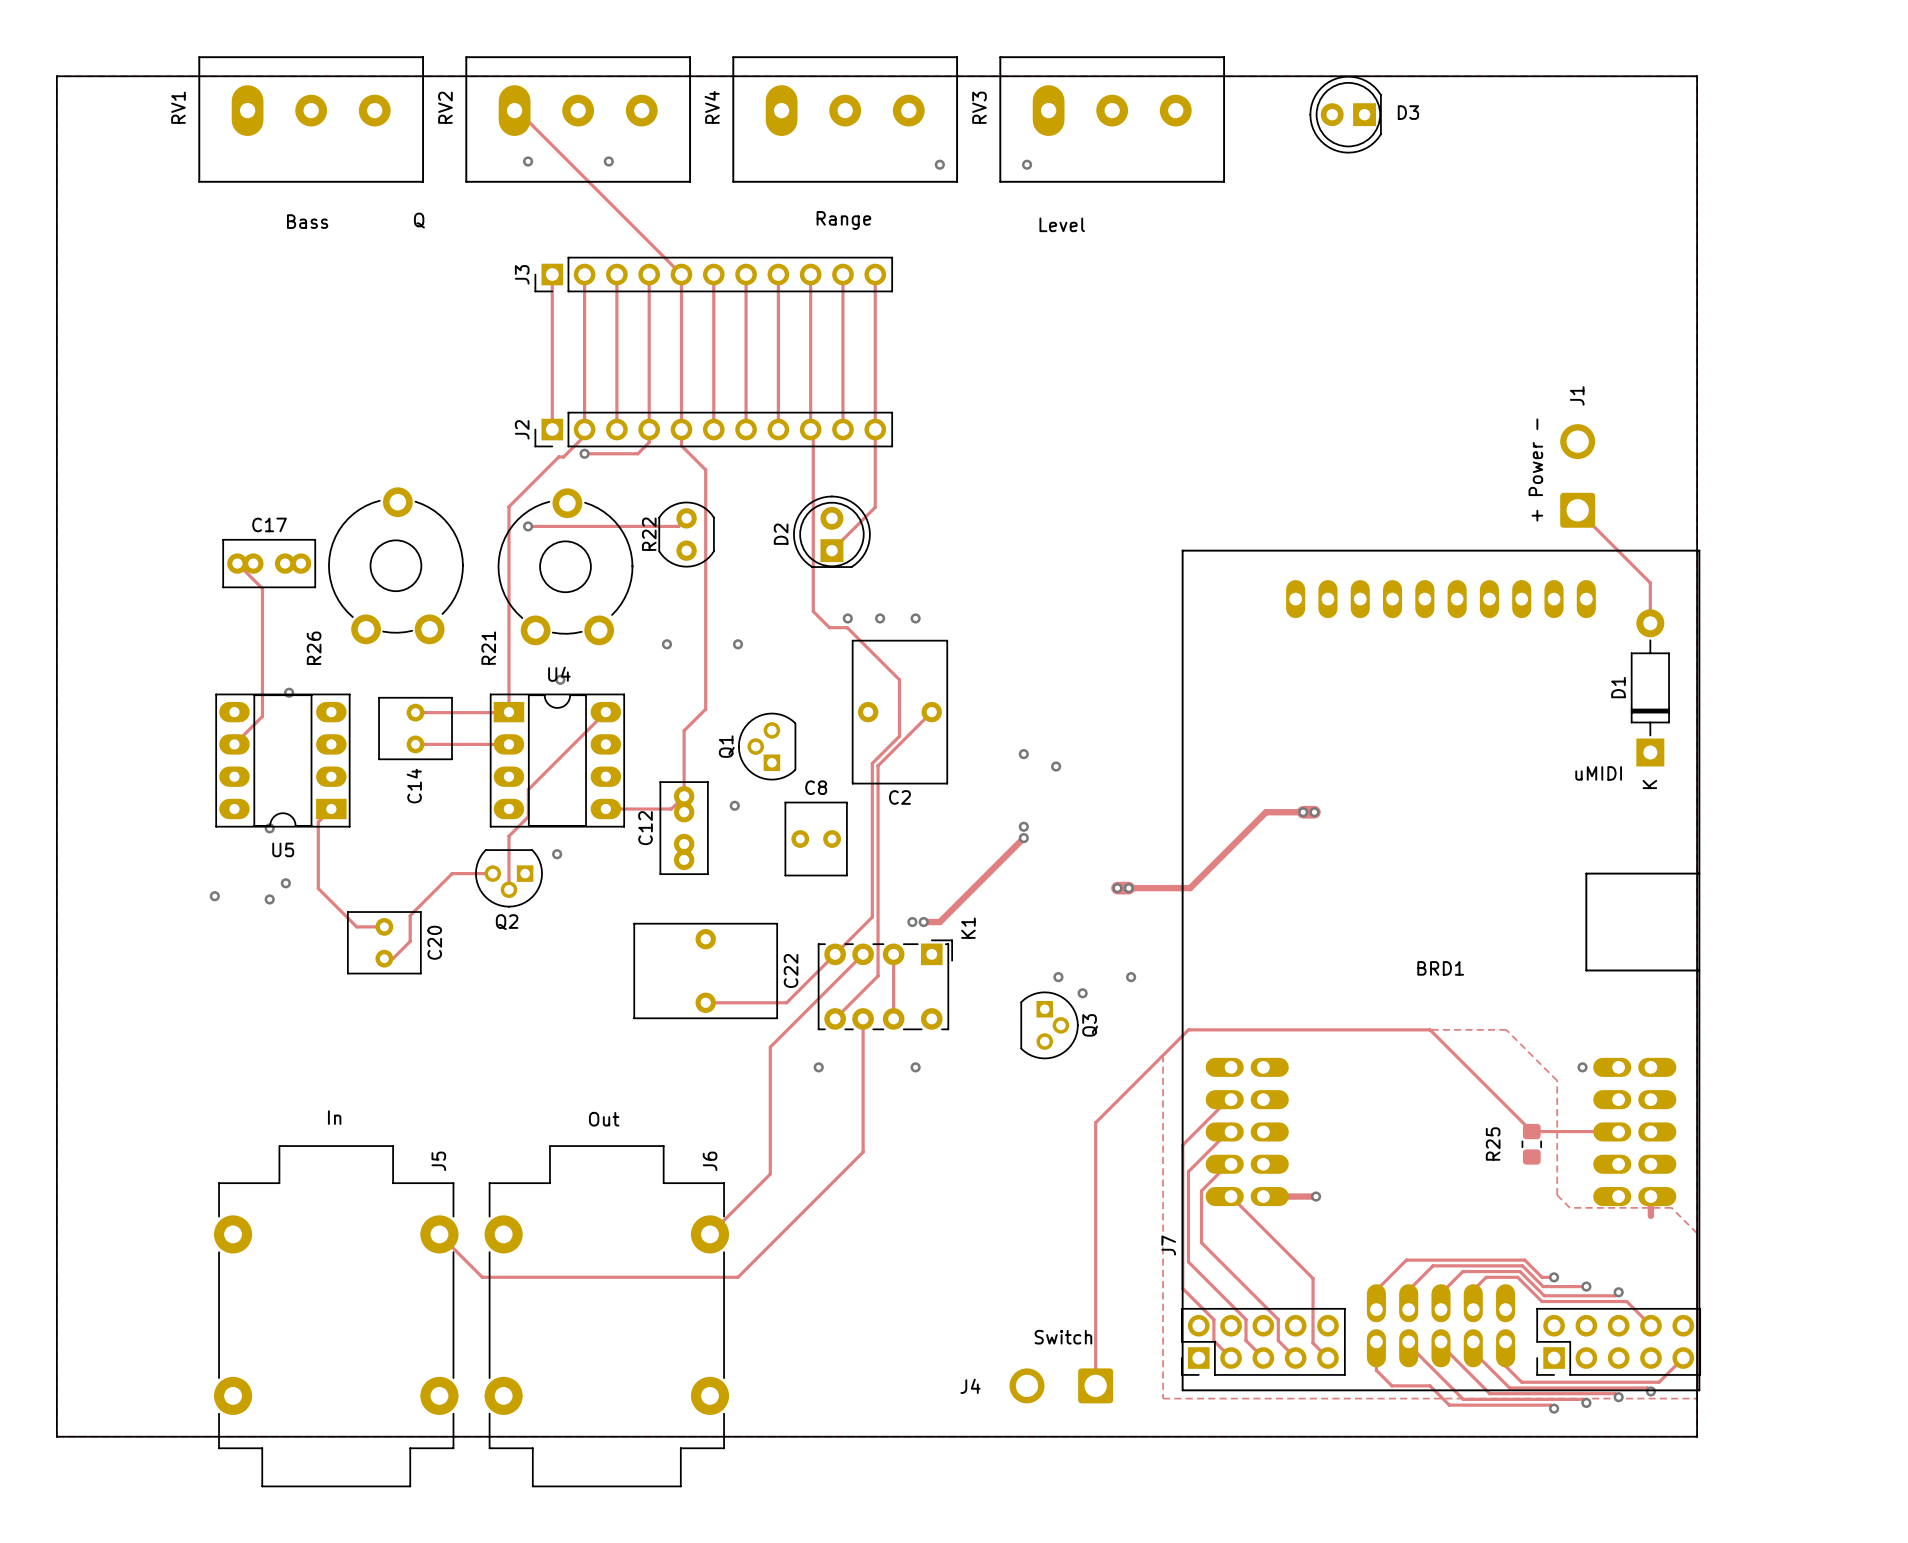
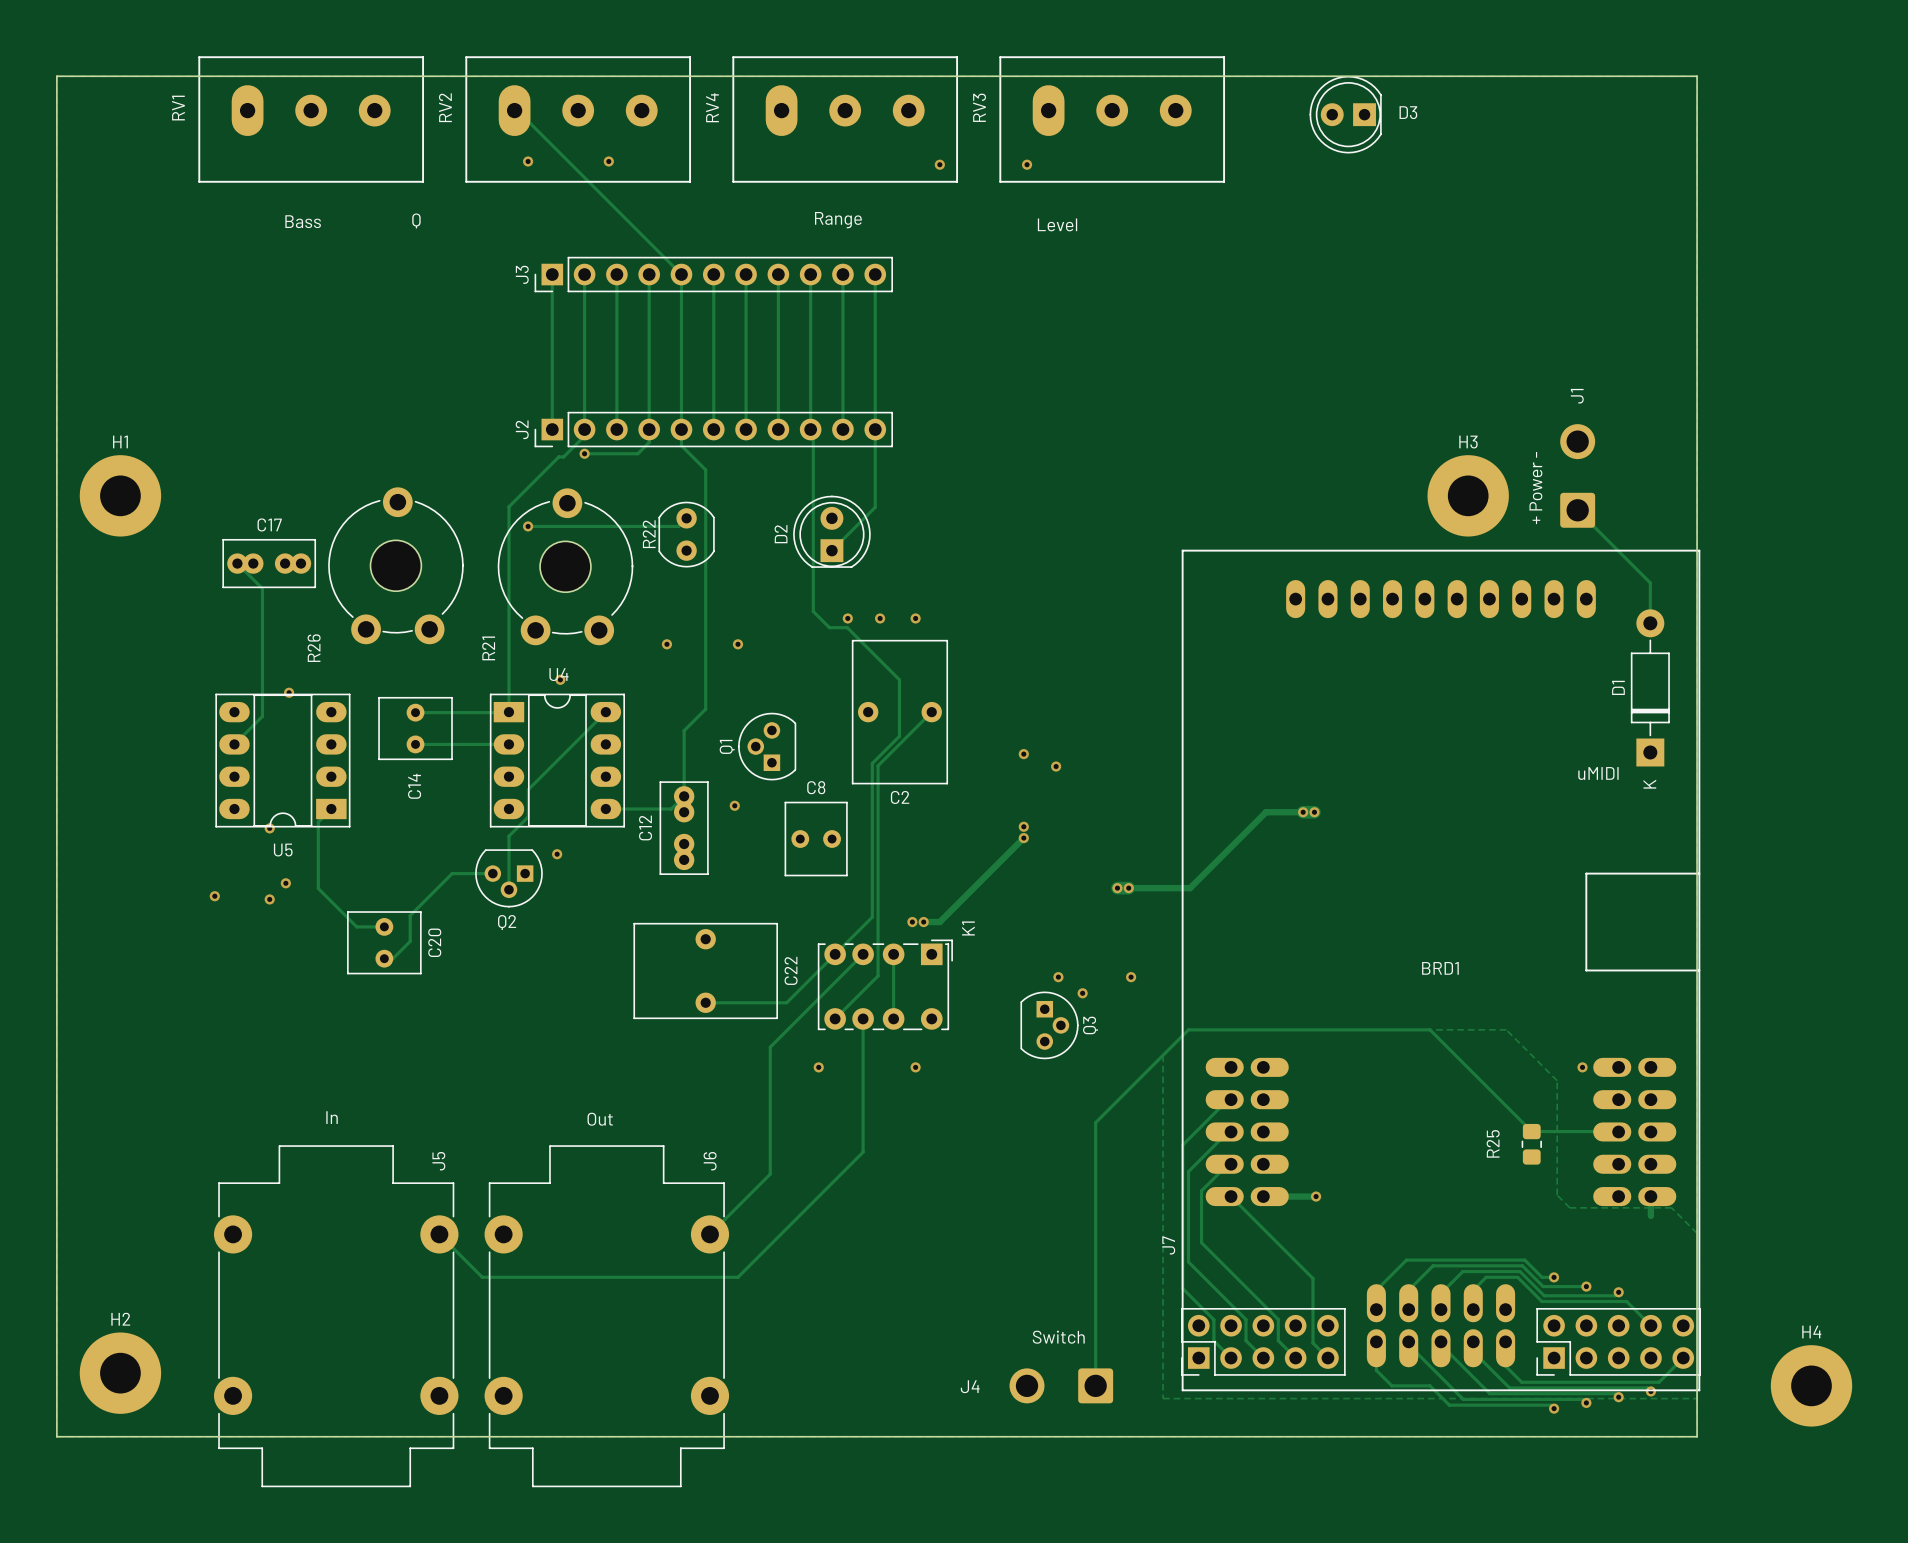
H1: none -> (120, 495)
H3: none -> (1468, 495)
H2: none -> (120, 1373)
H4: none -> (1811, 1385)

